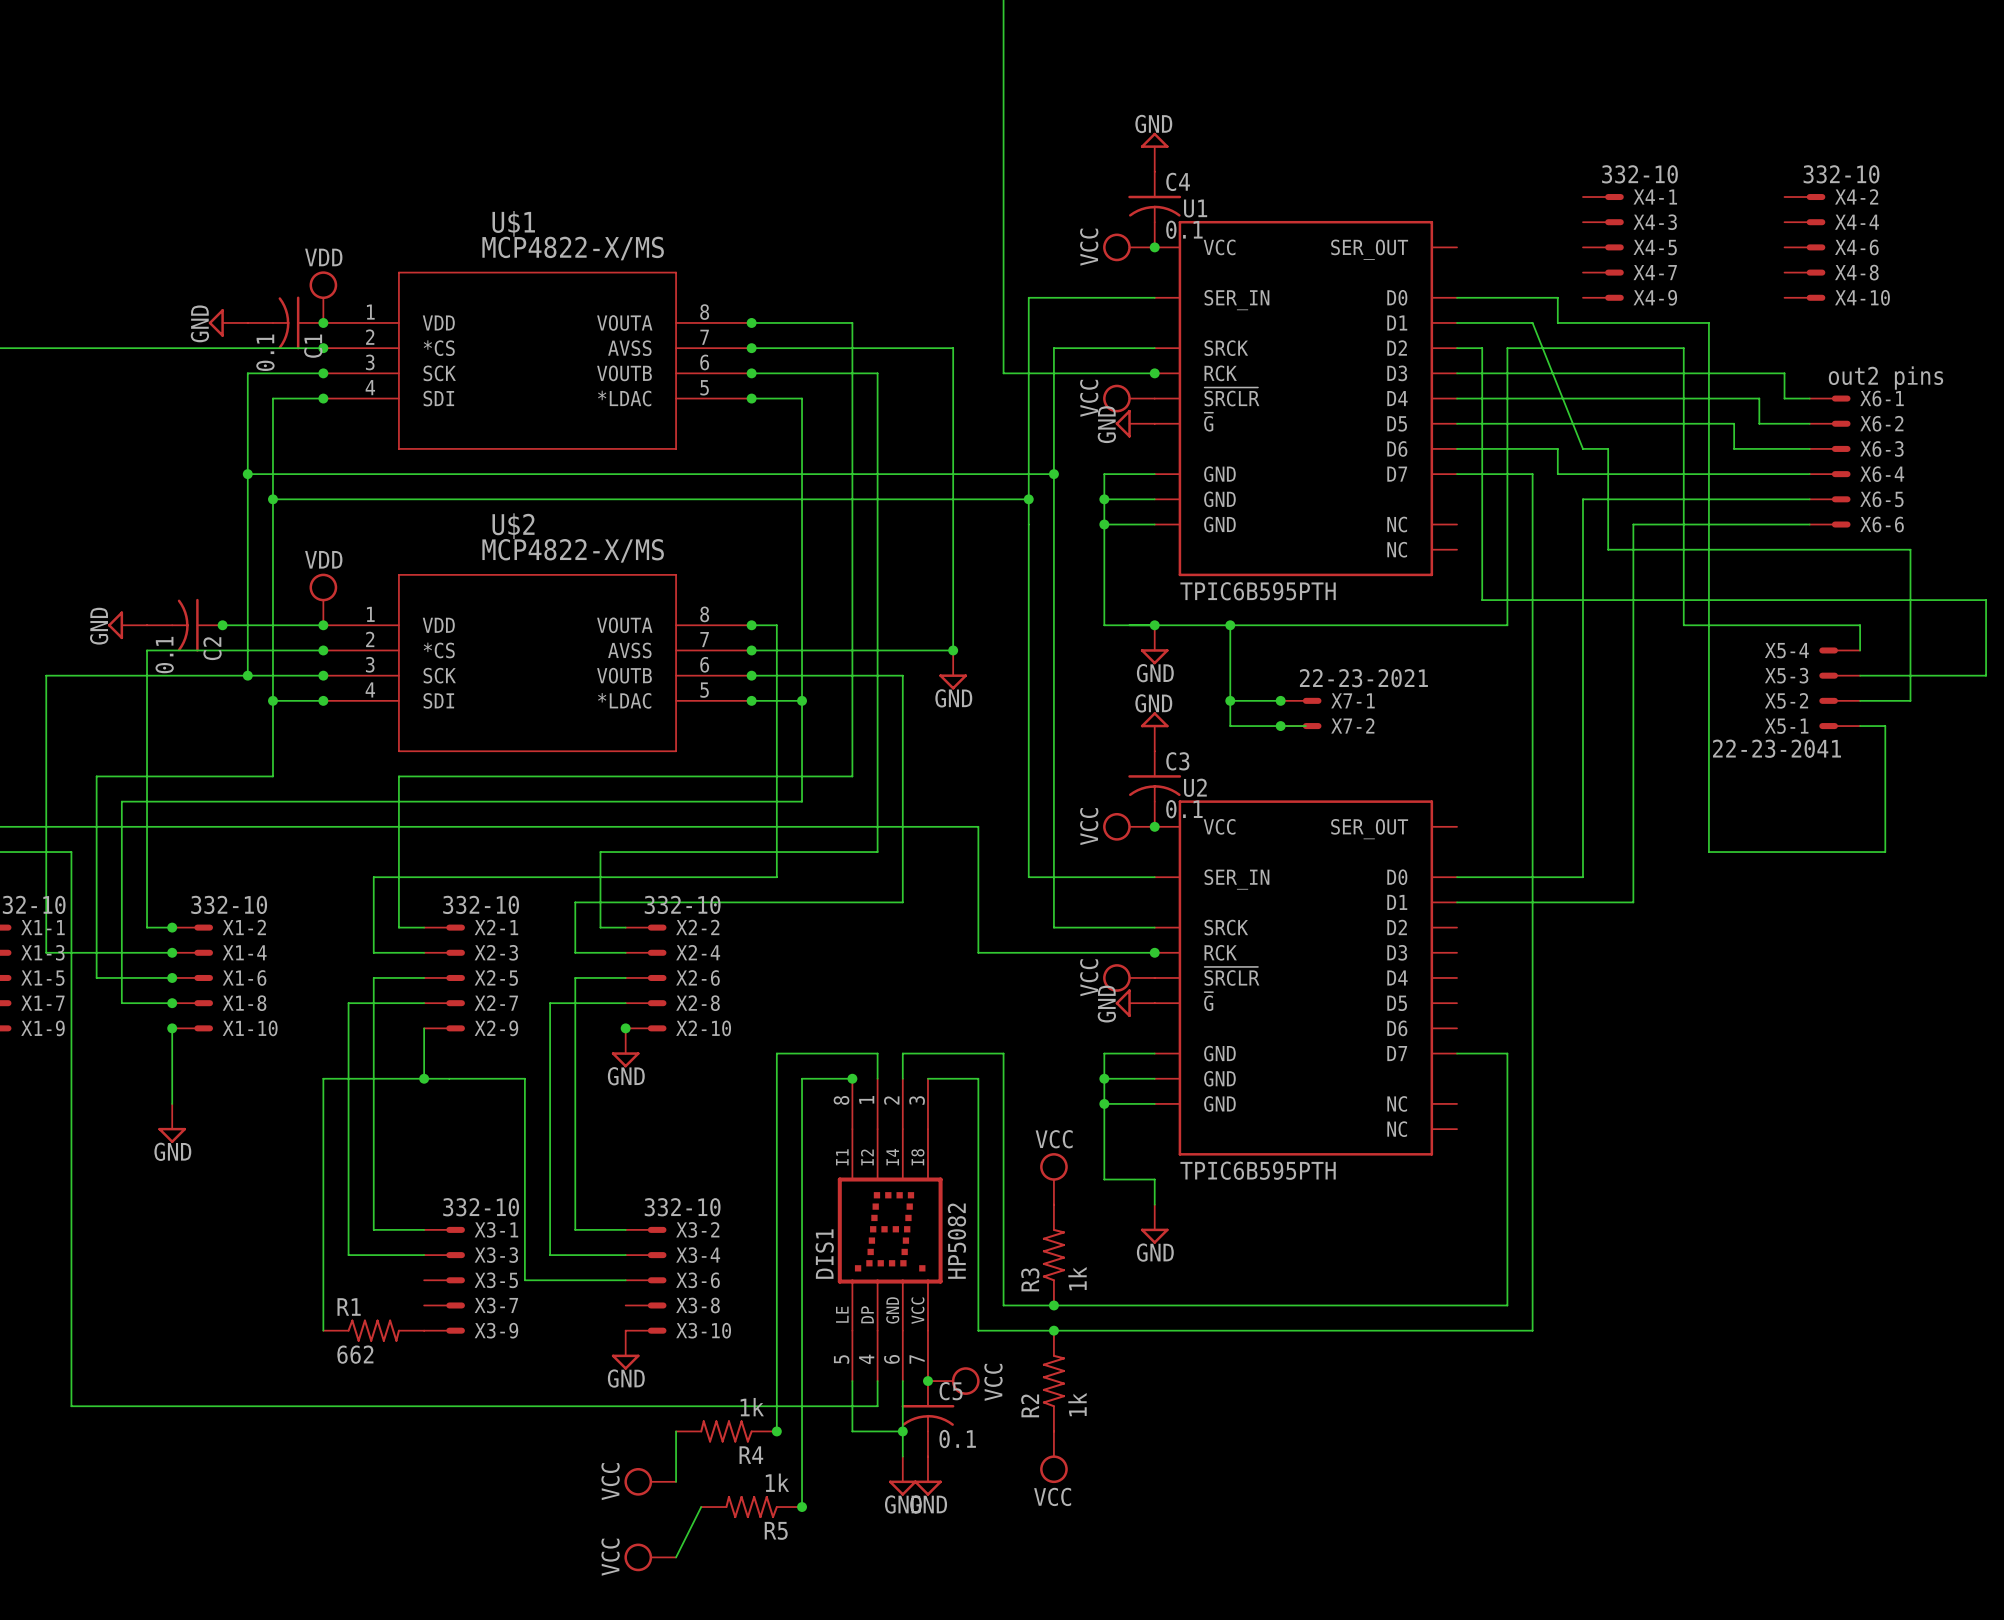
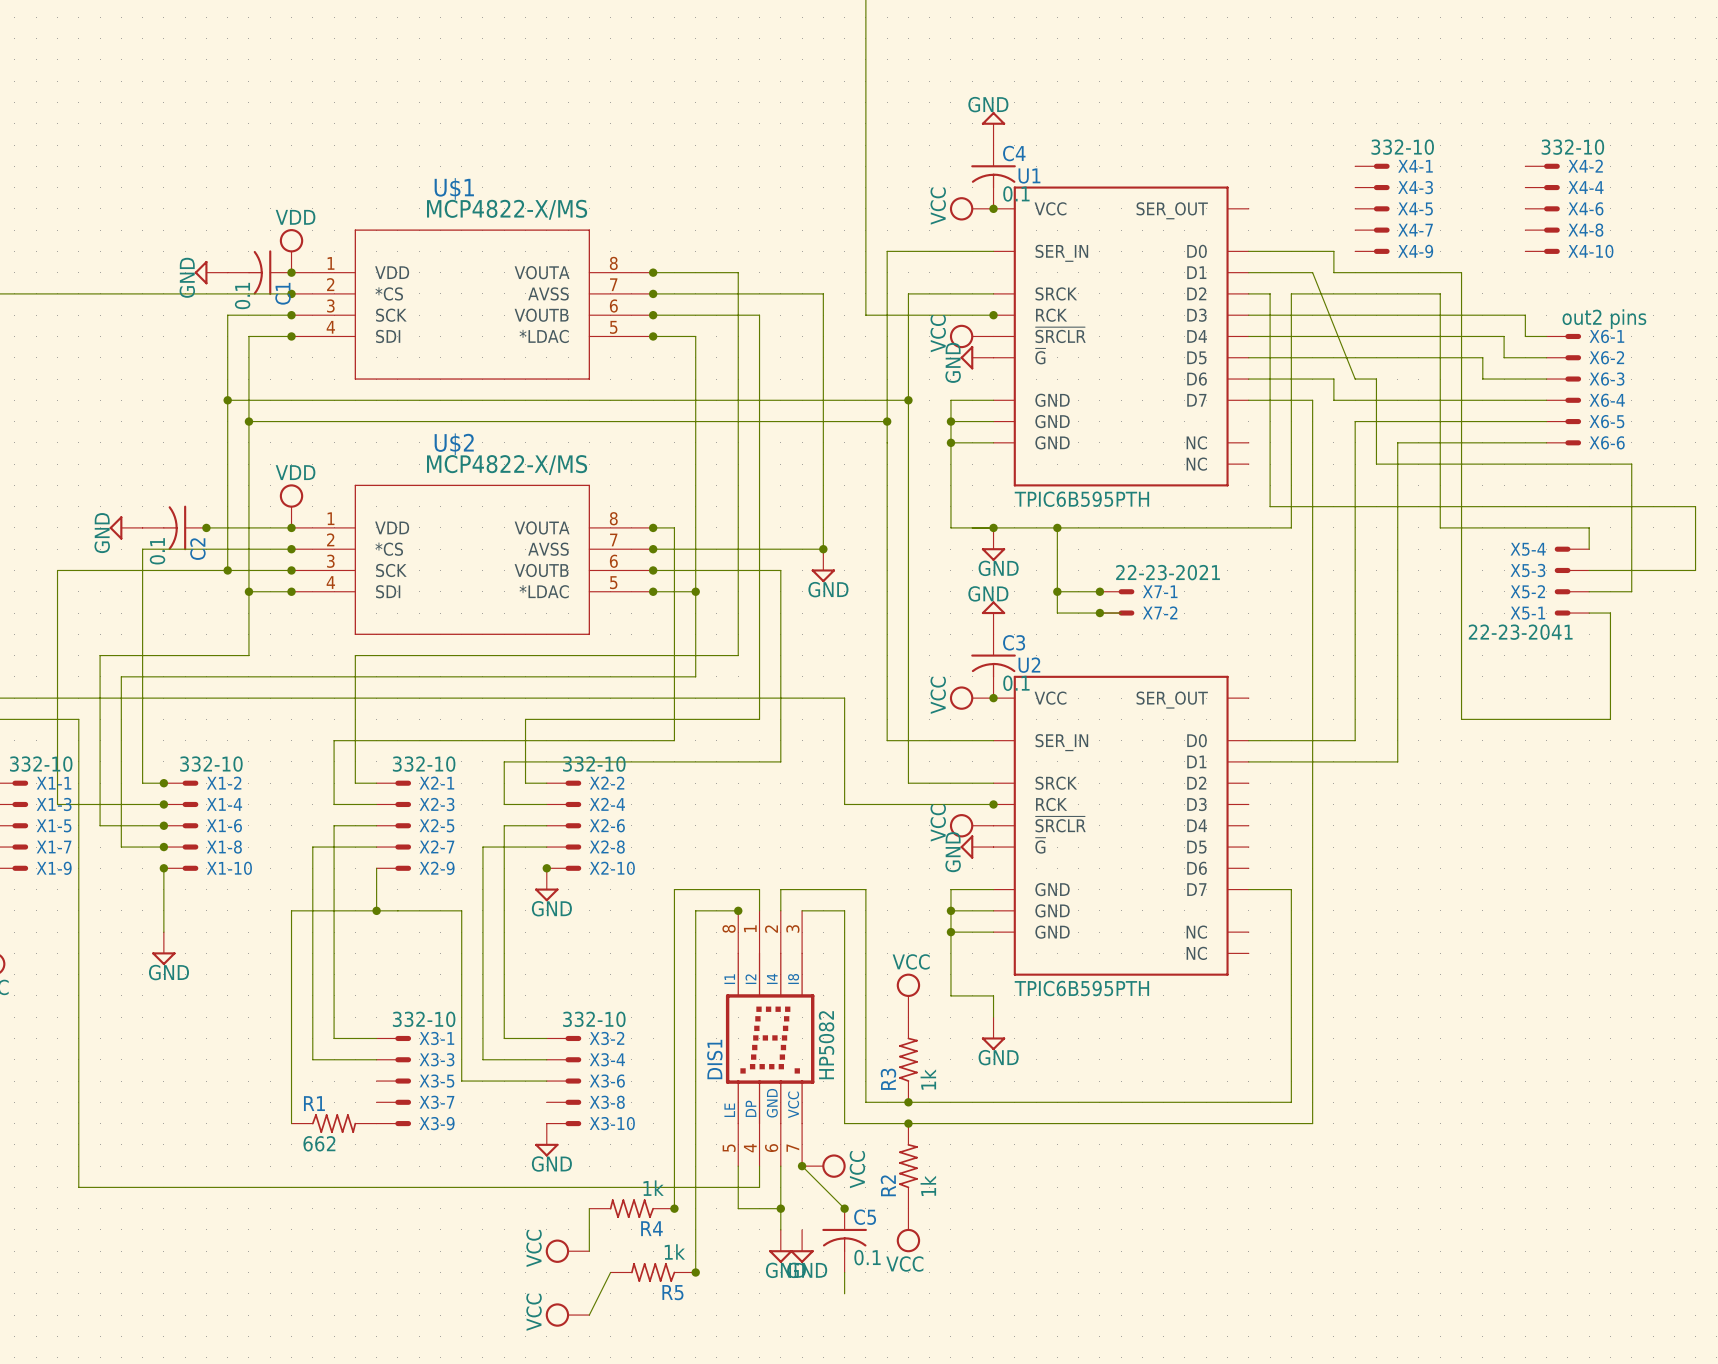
wire: none -> (802, 1166) (844, 1208)
C5 position: (927, 1418) -> (844, 1240)
junction: none -> (844, 1208)
wire: none -> (844, 1272) (844, 1293)

